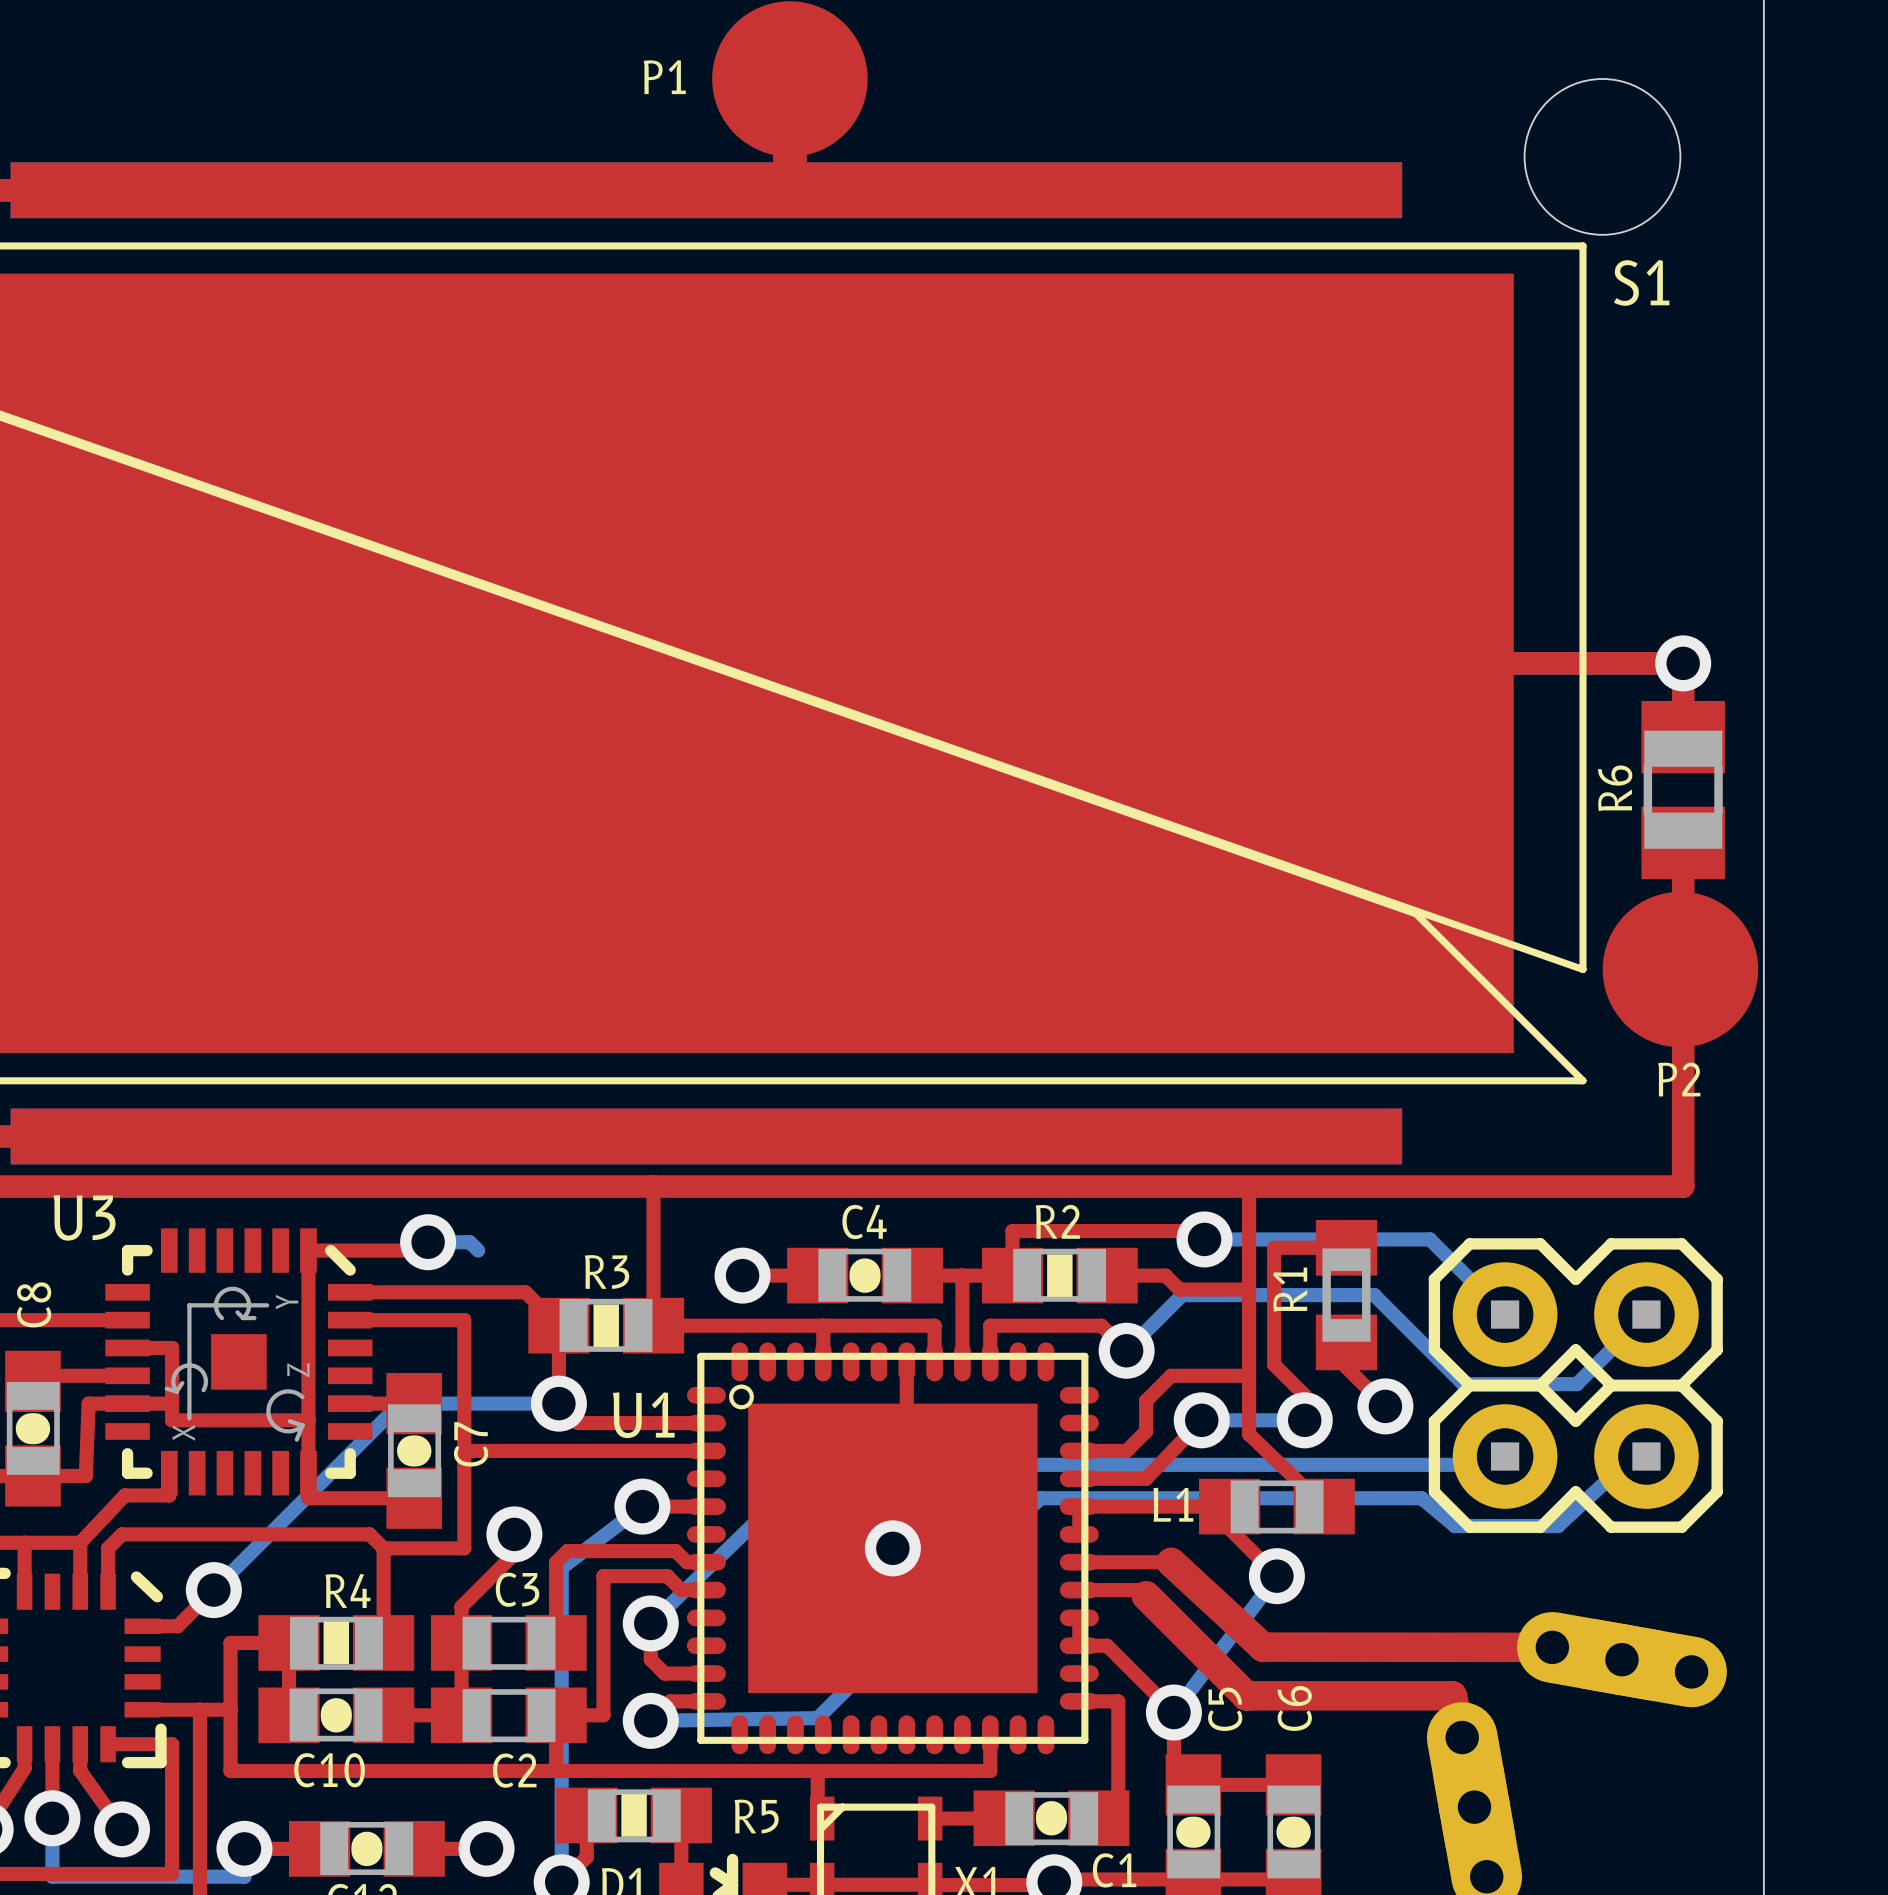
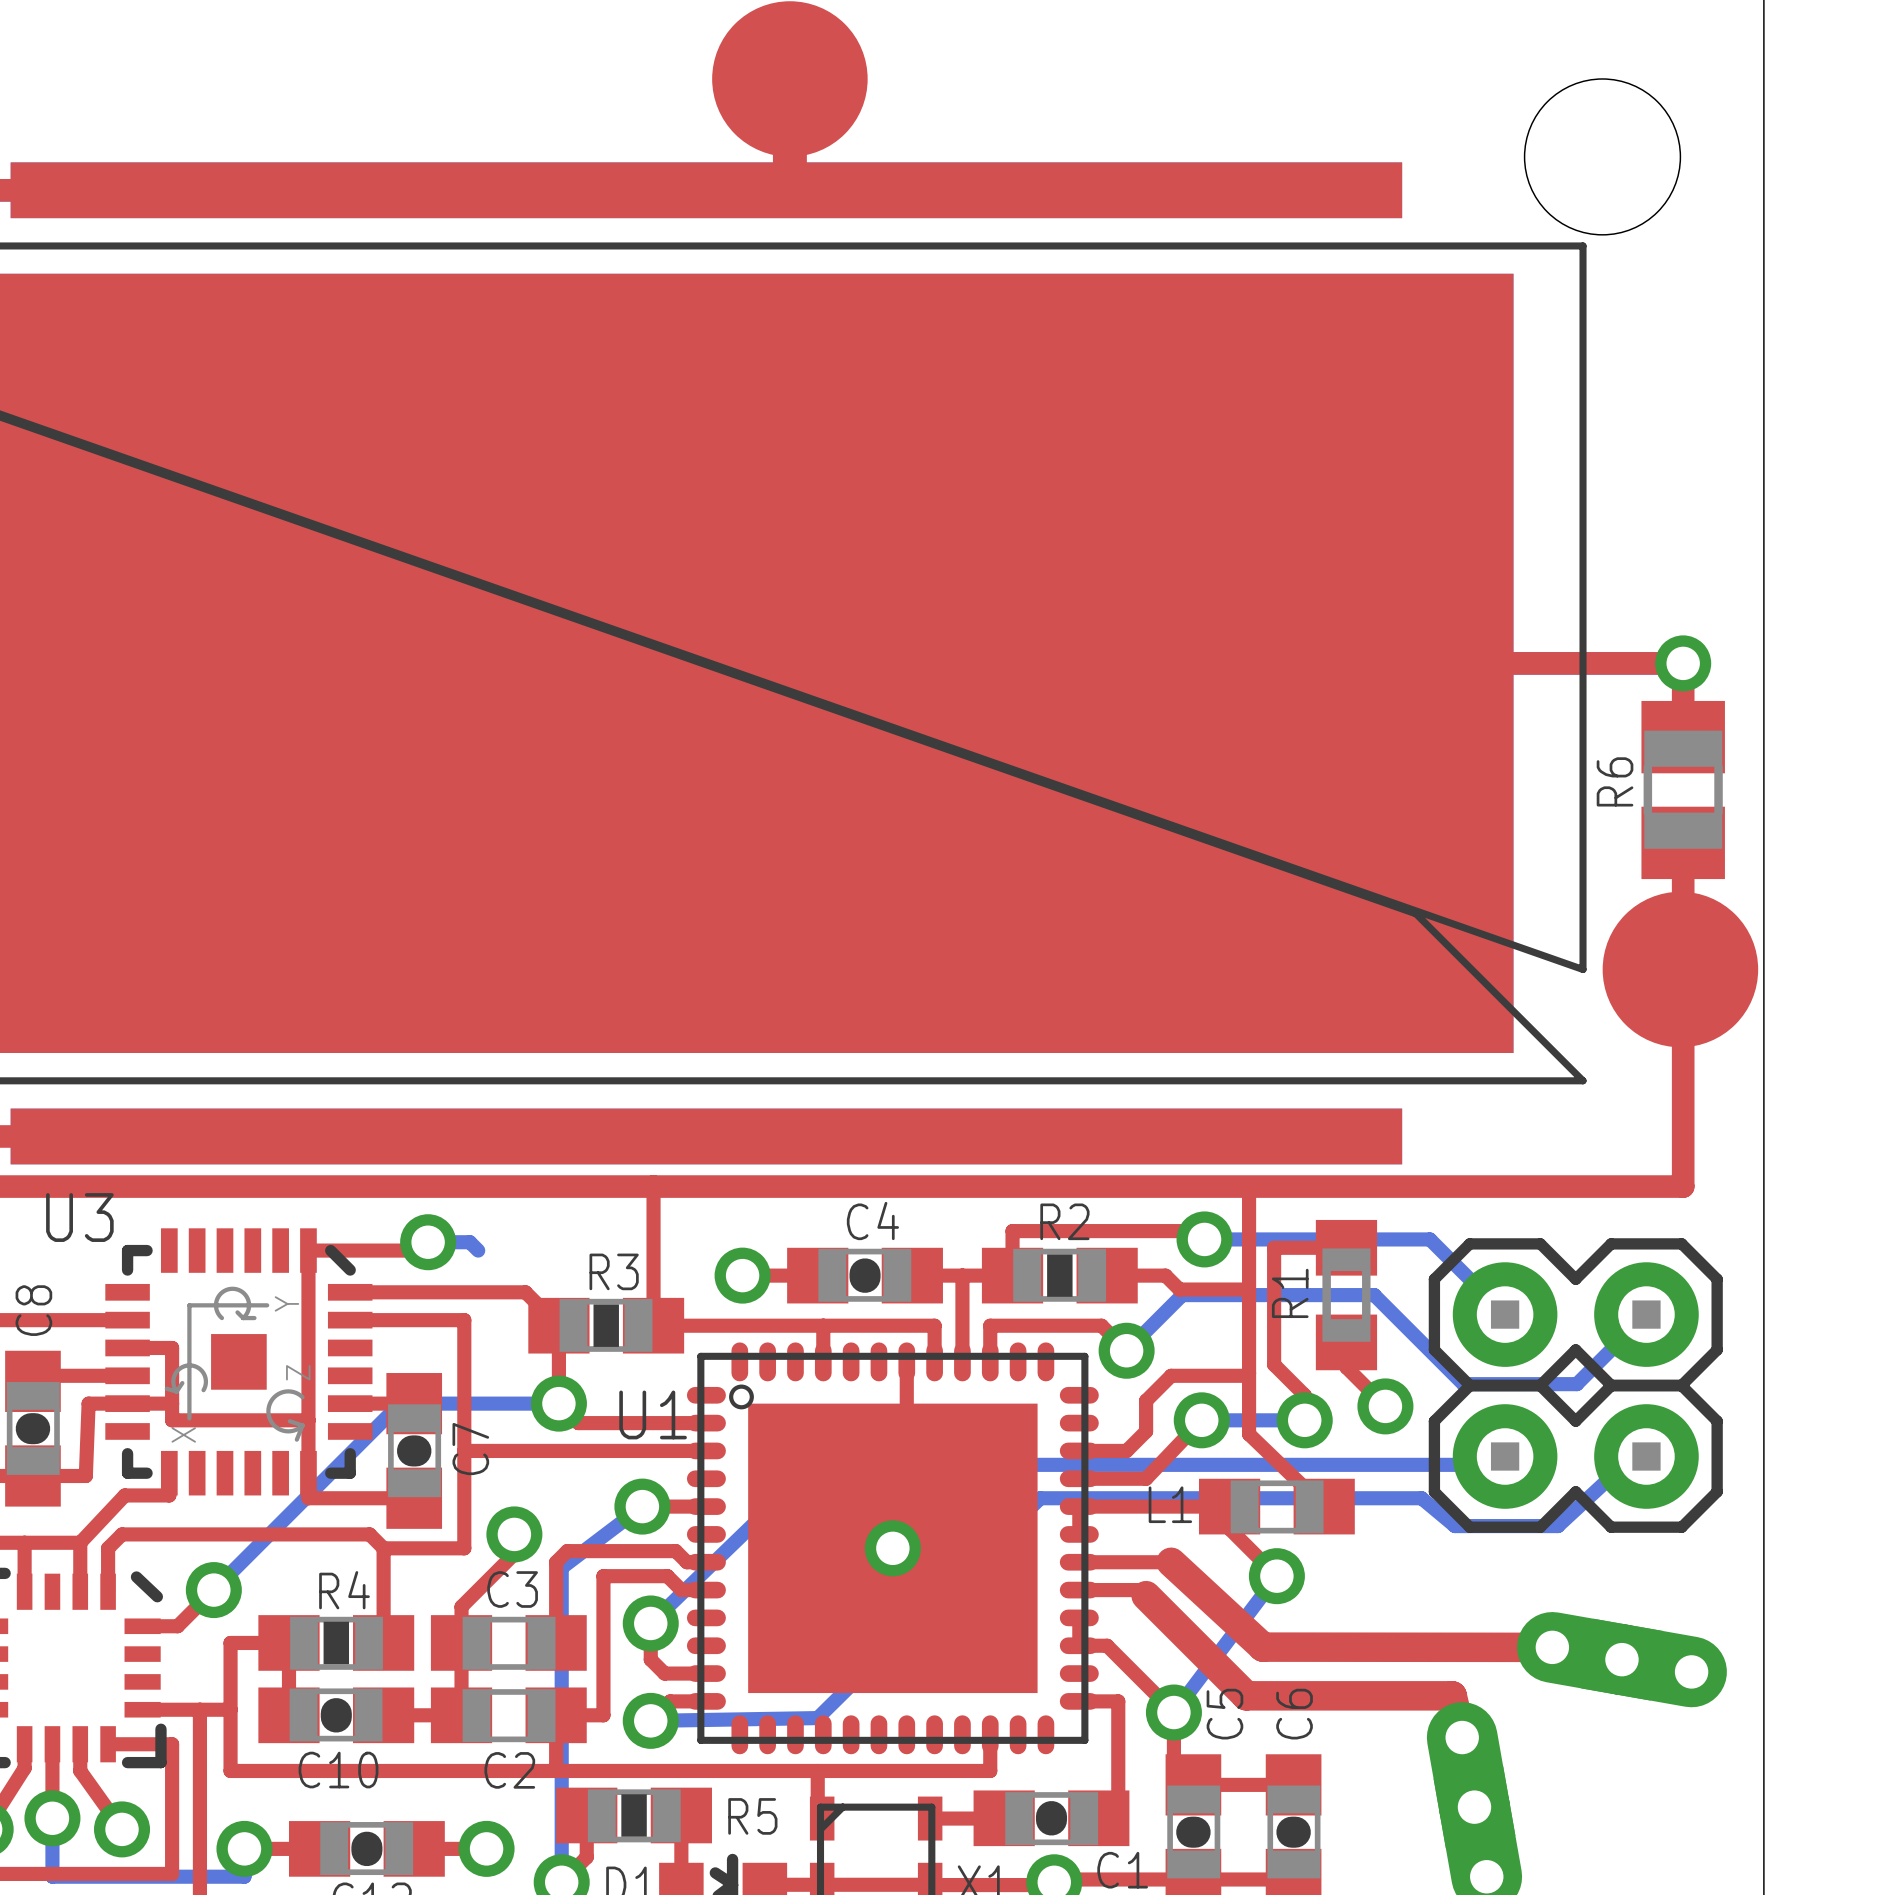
text: P1 (664, 77) -> none
text: S1 (1641, 282) -> none
text: P2 (1679, 1079) -> none

